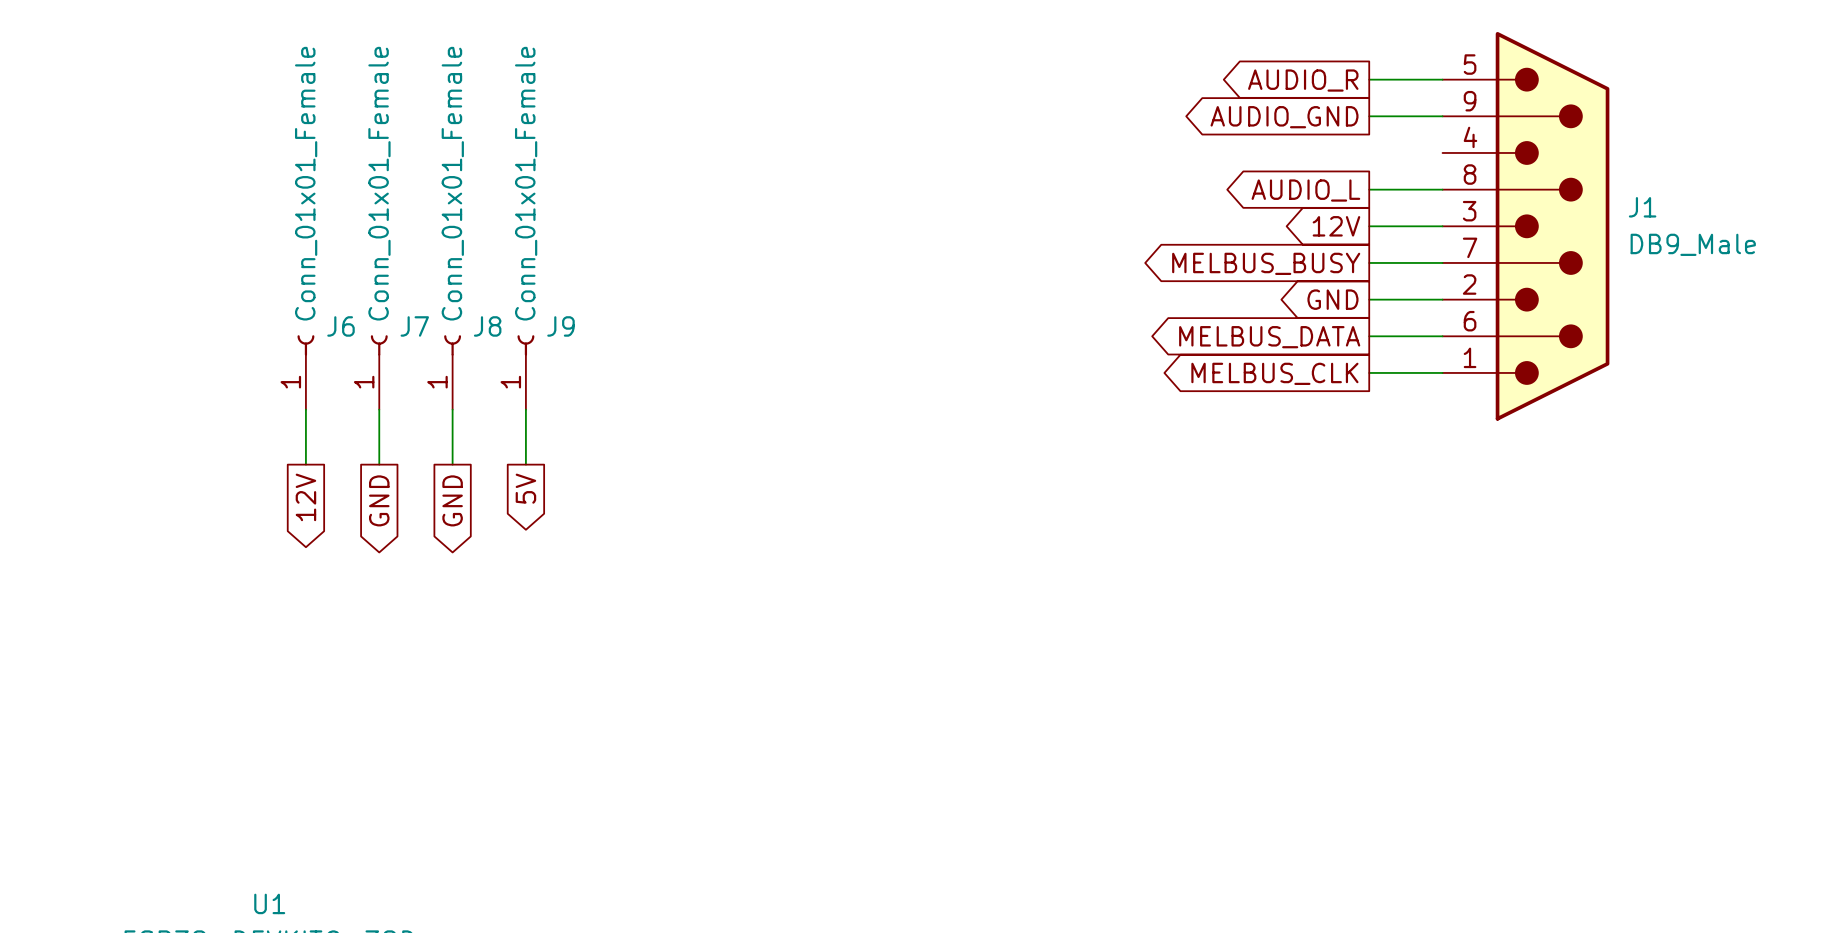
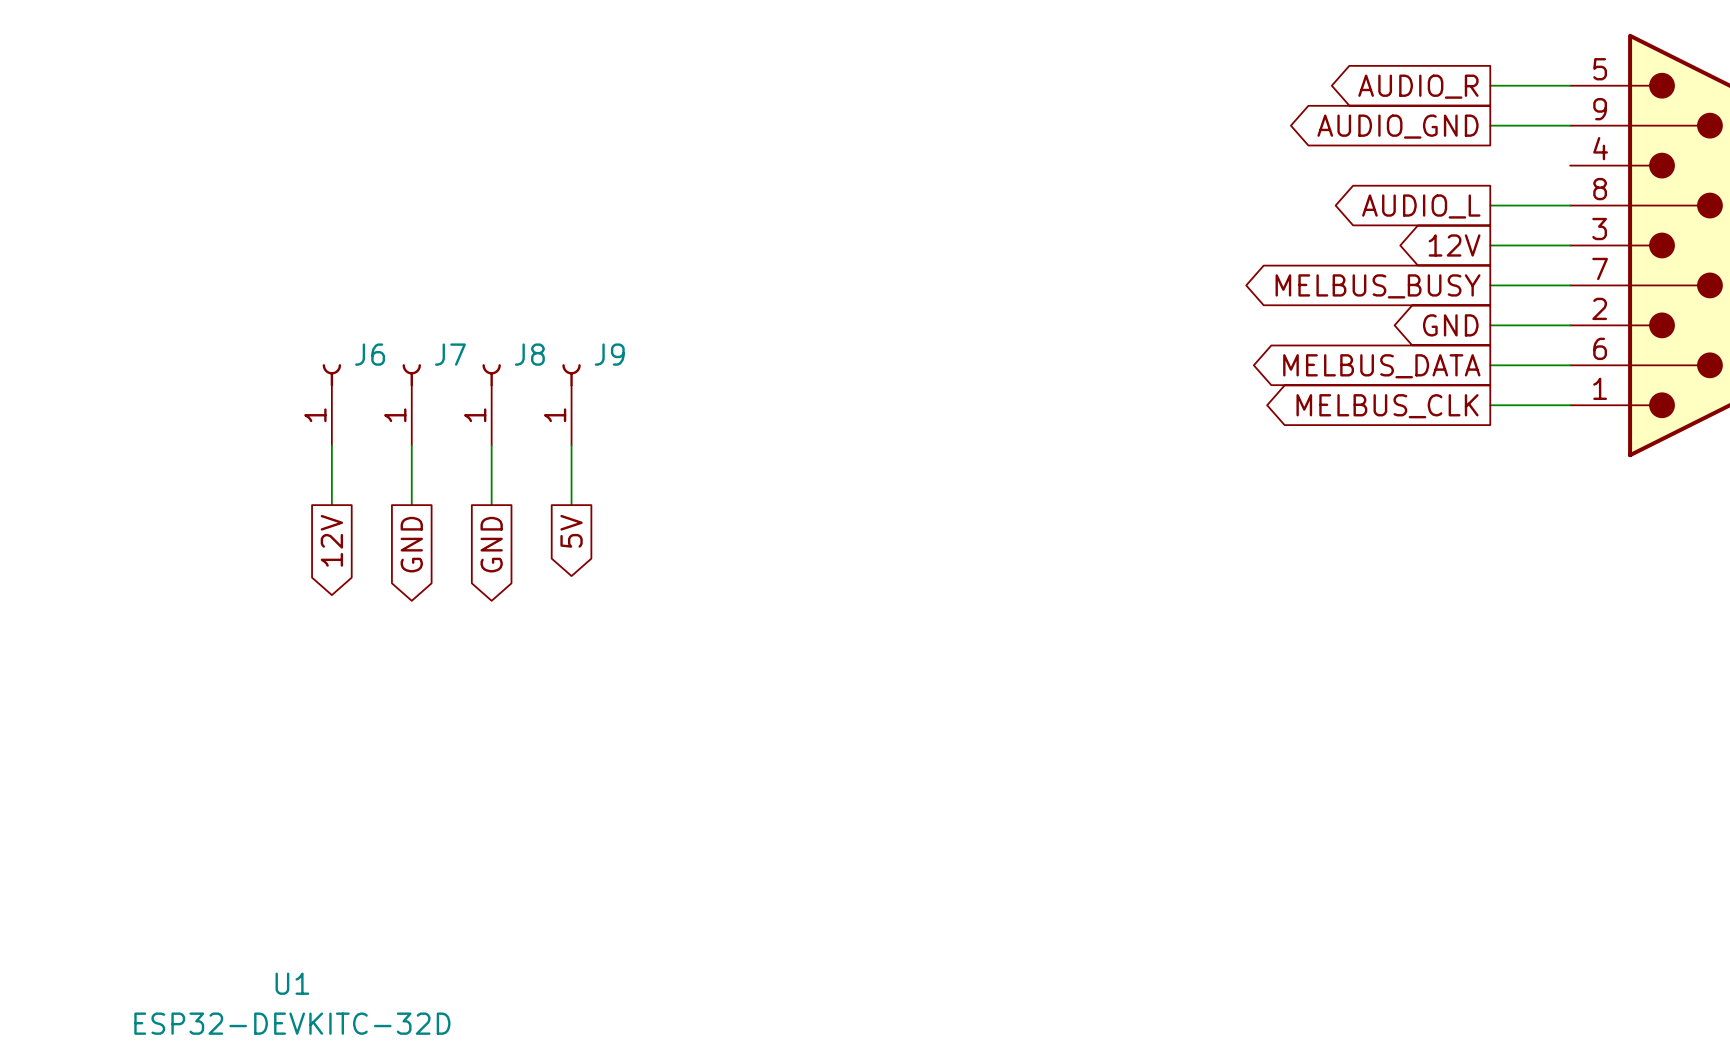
J6 value: Conn_01x01_Female (306, 183) -> none
J7 value: Conn_01x01_Female (379, 183) -> none
J8 value: Conn_01x01_Female (452, 183) -> none
J9 value: Conn_01x01_Female (526, 183) -> none

